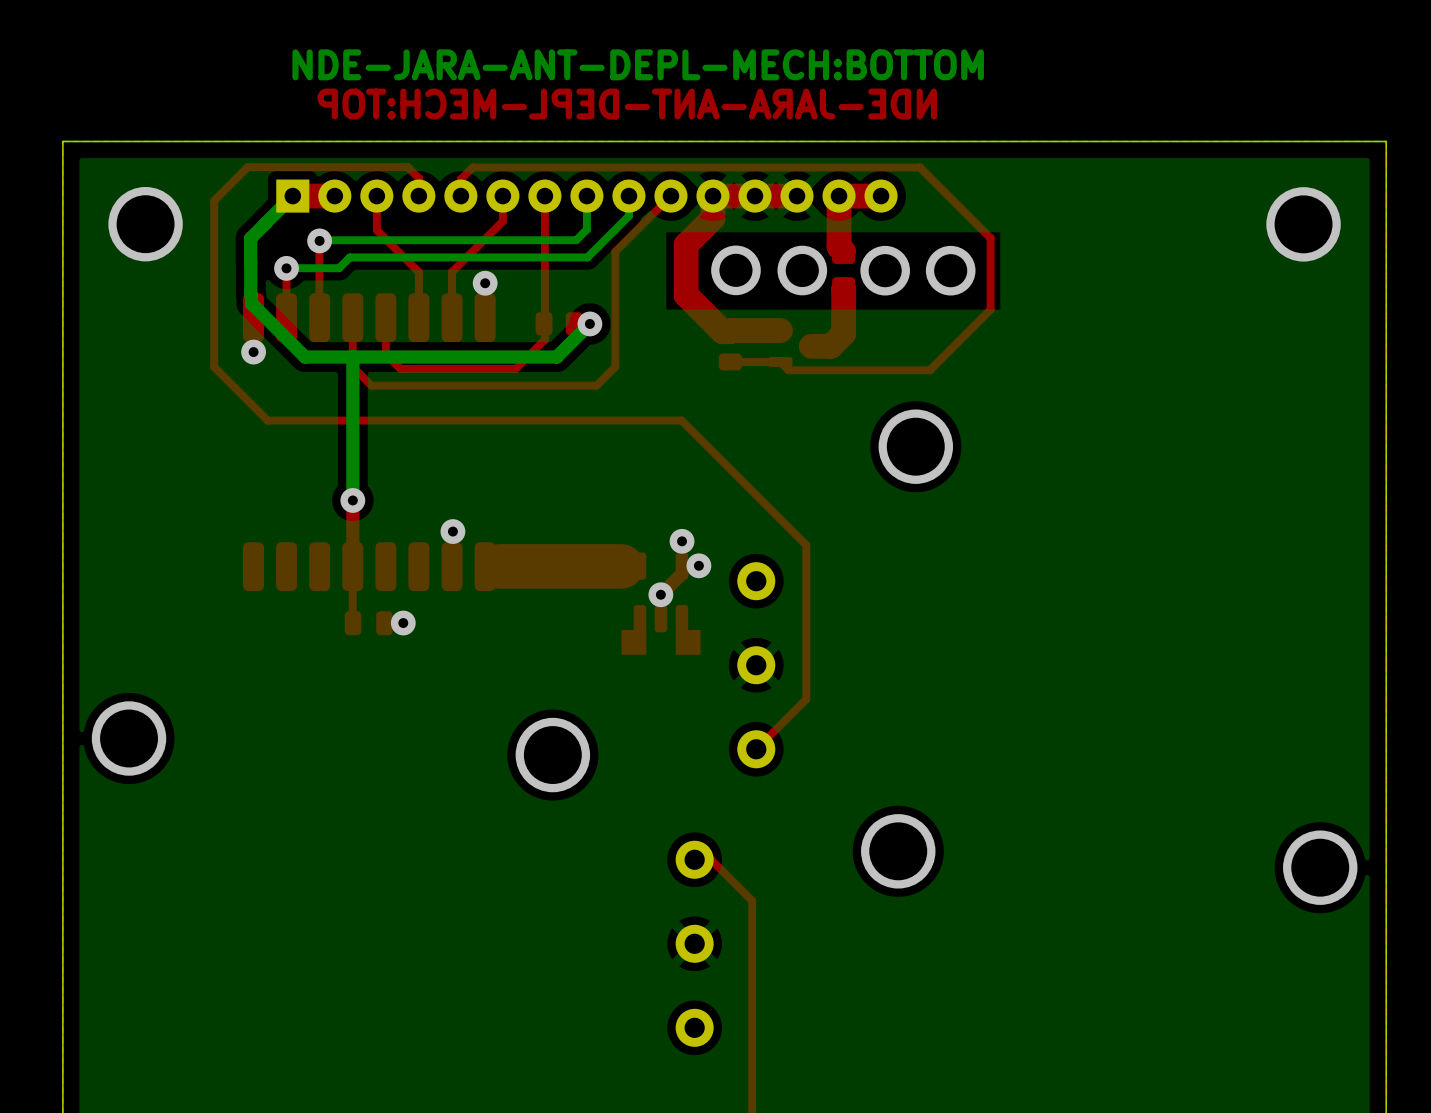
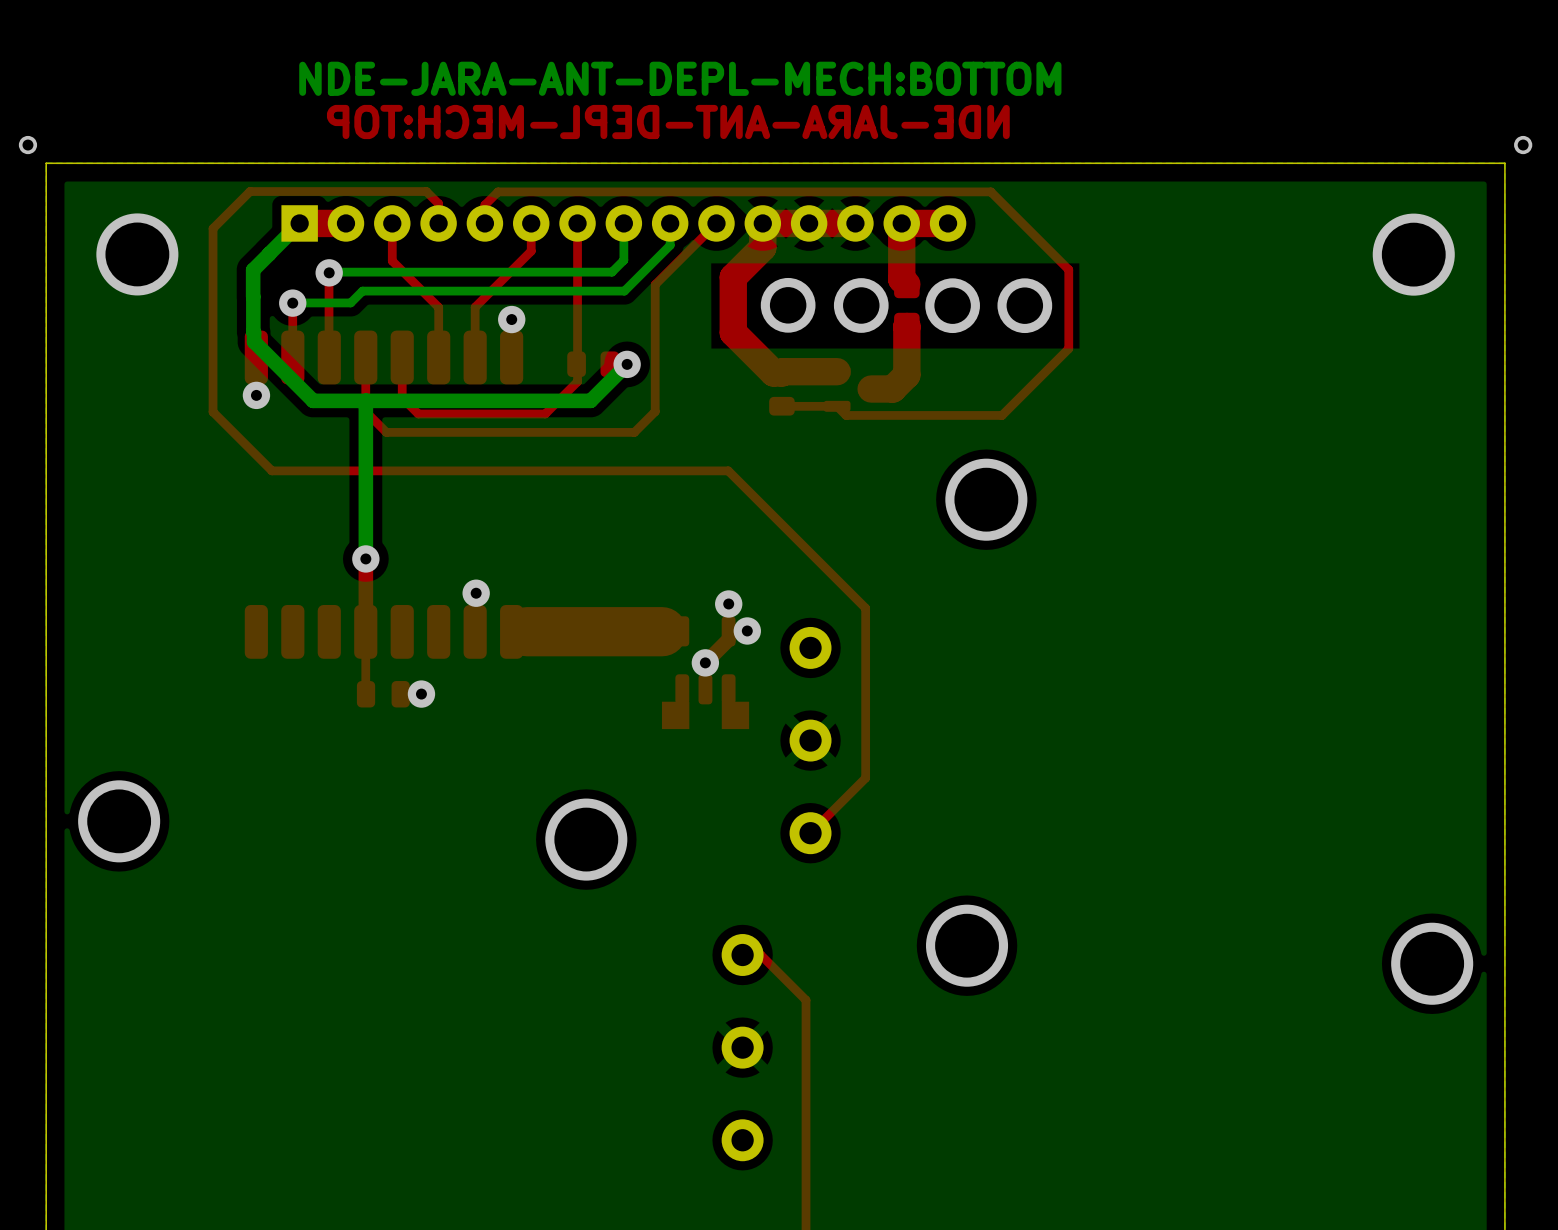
via: none -> (27, 145)
via: none -> (1523, 145)

